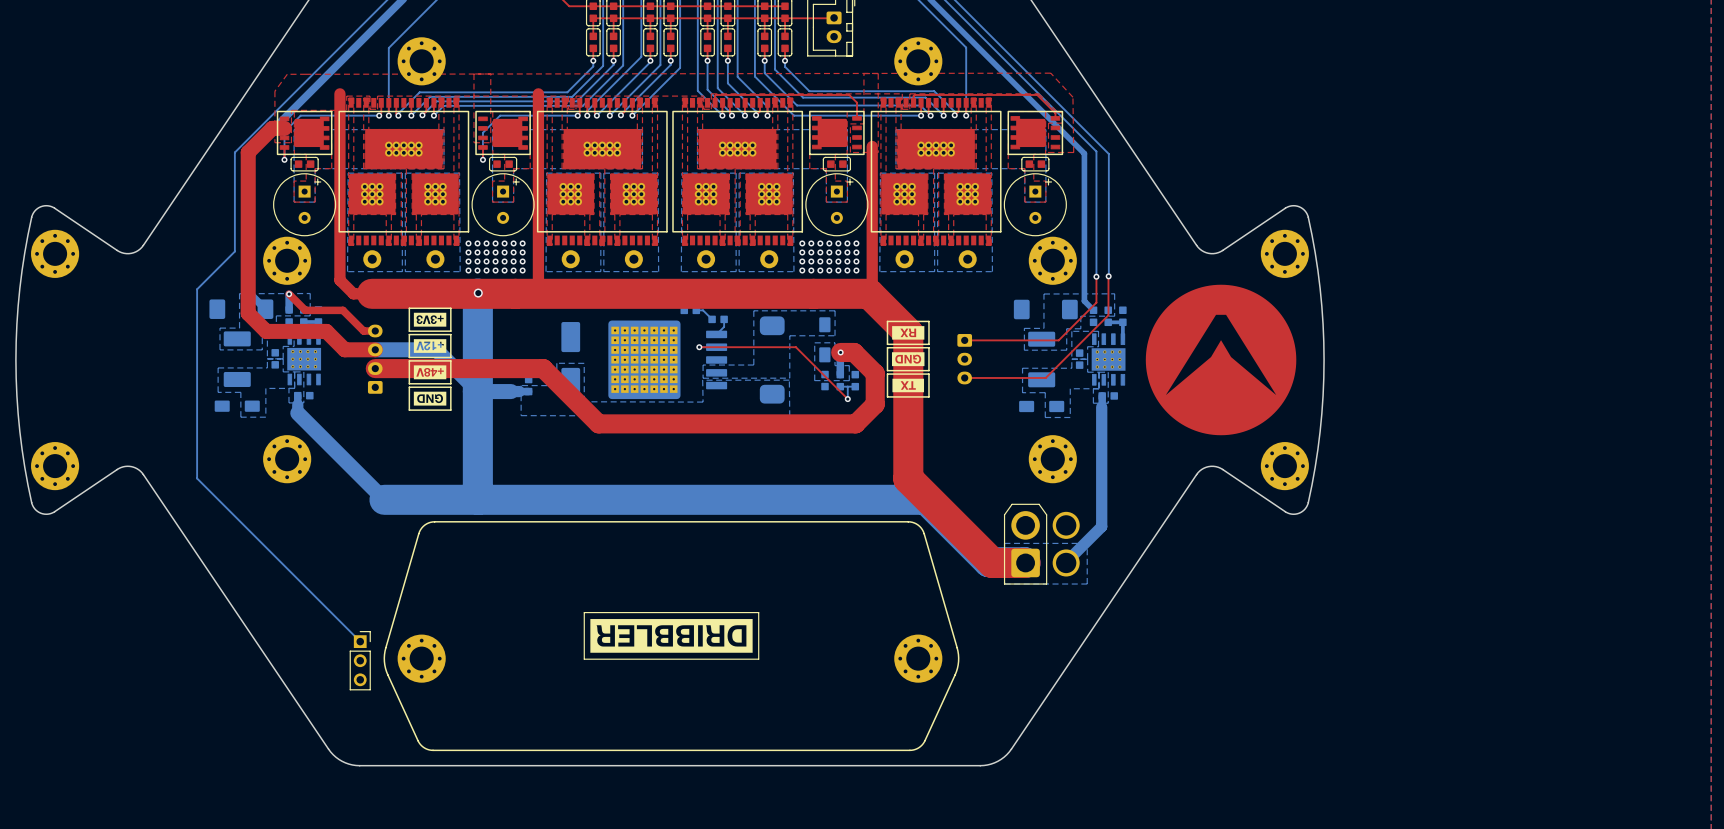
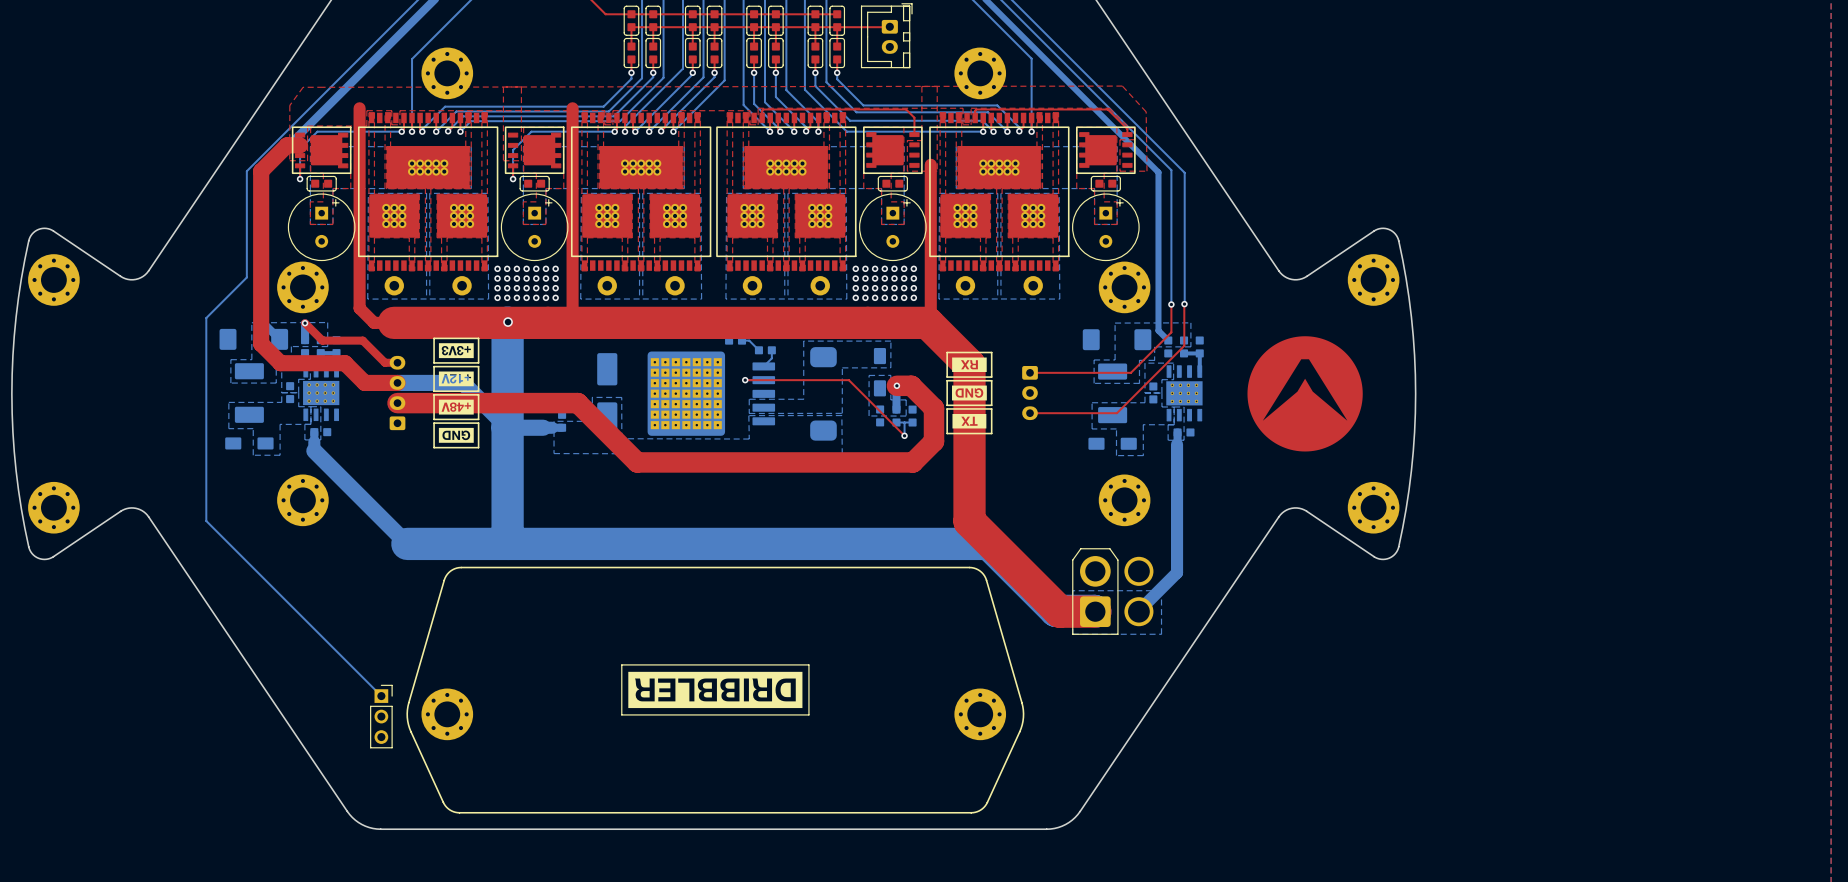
part footprint: [1145, 284, 1297, 436] -> [1247, 336, 1363, 452]

